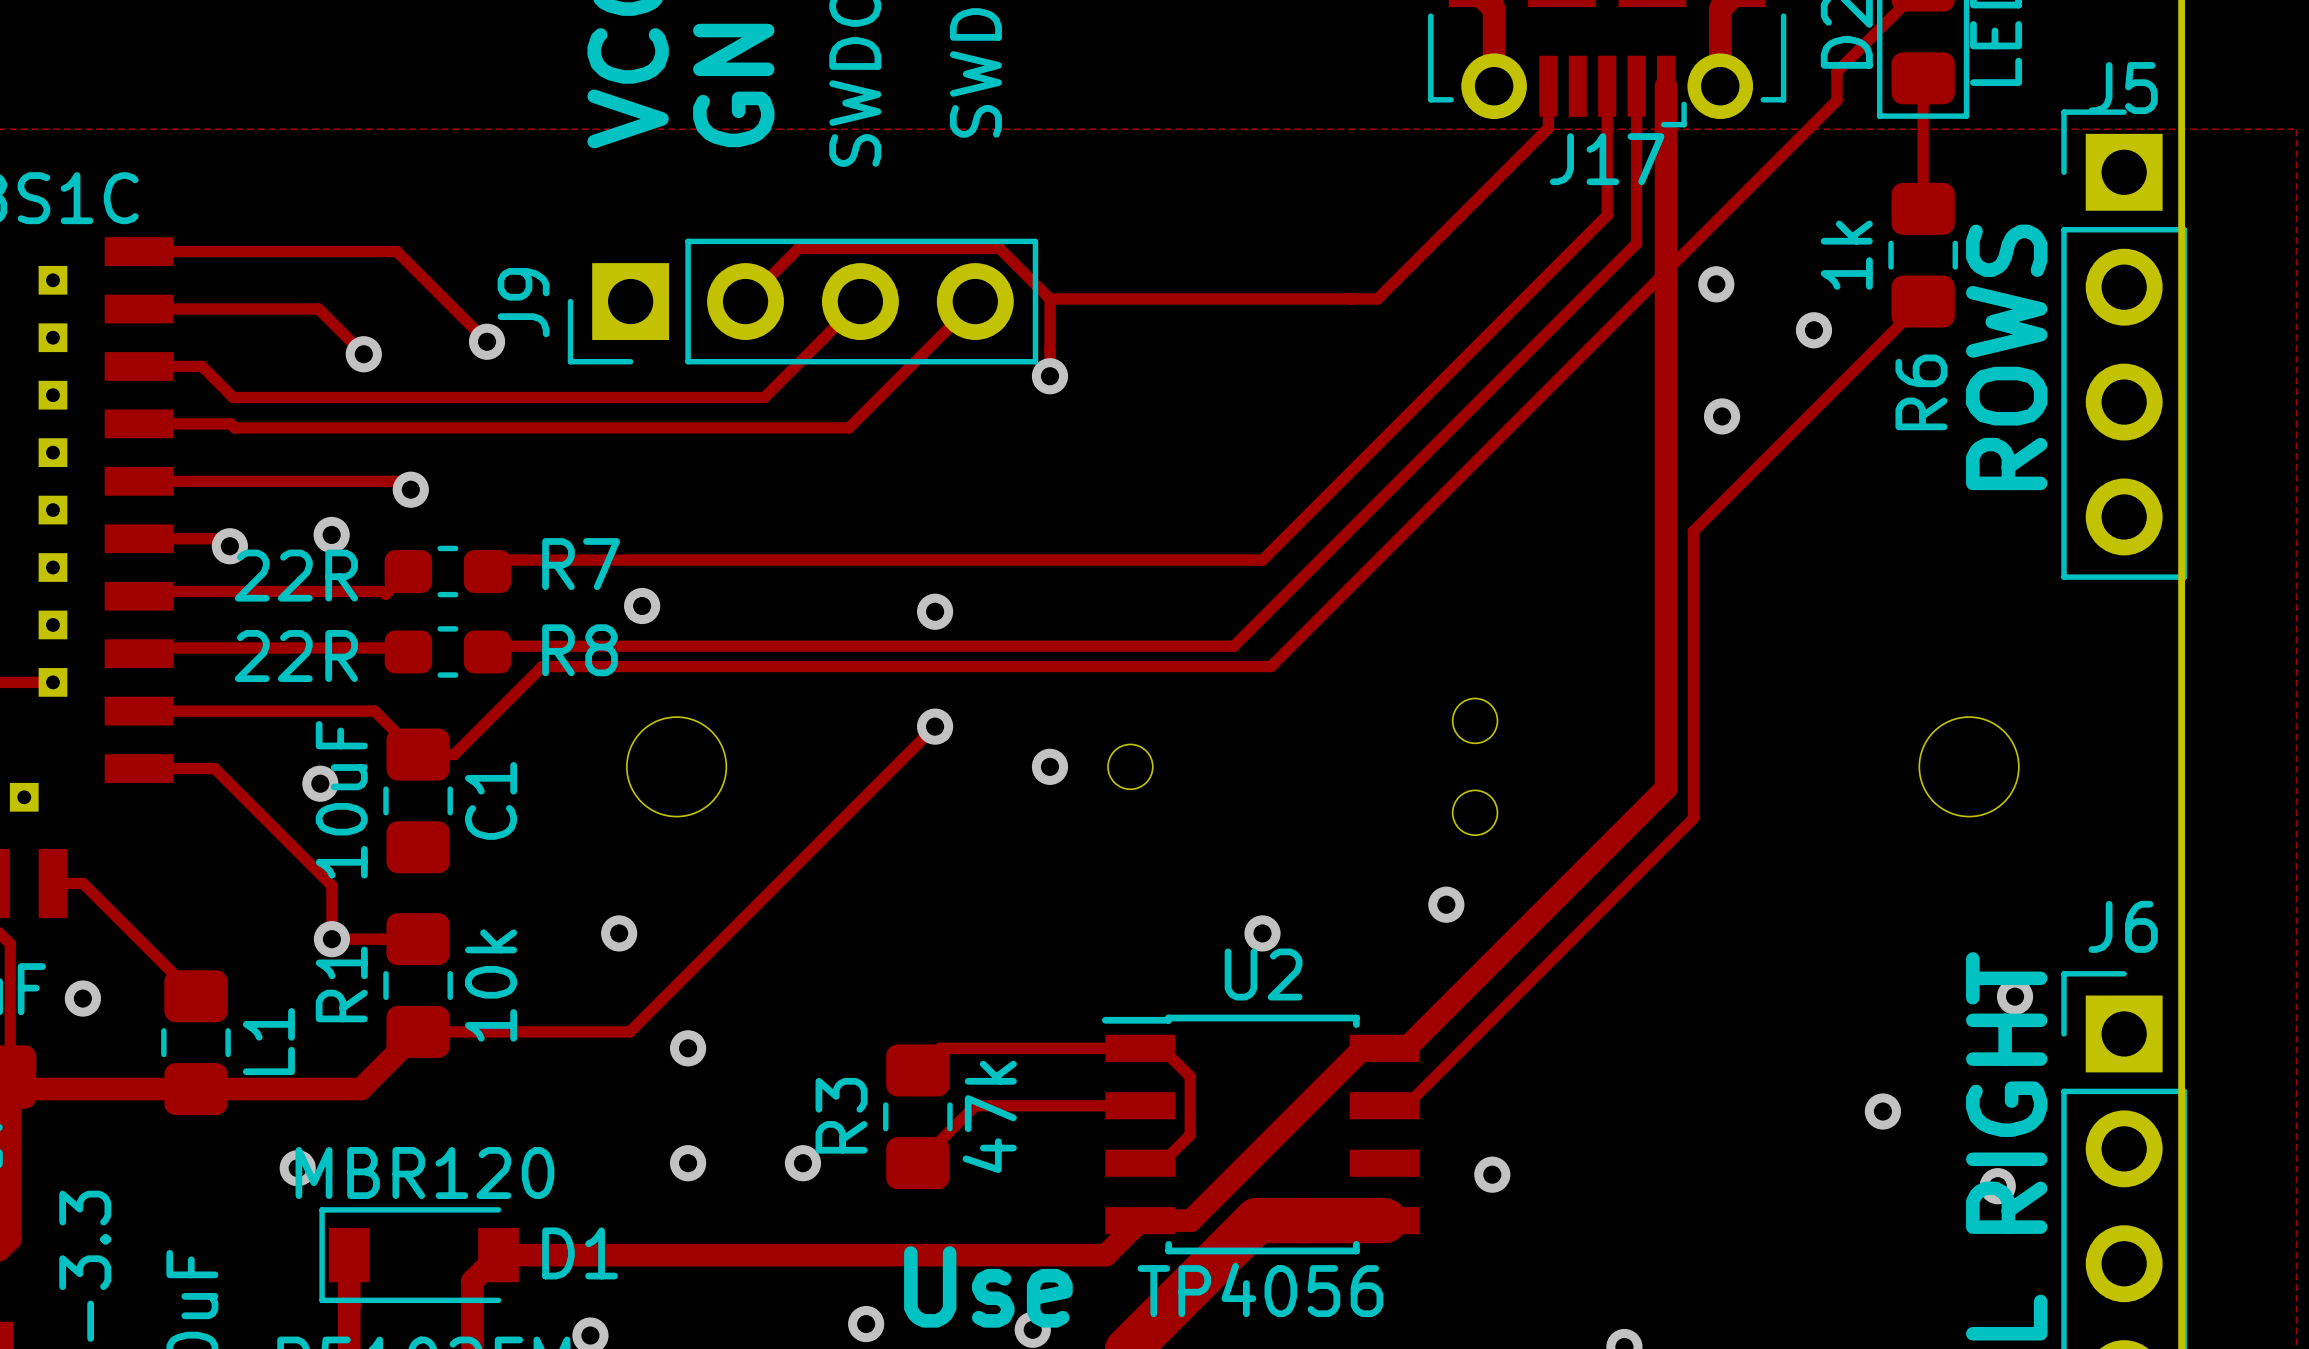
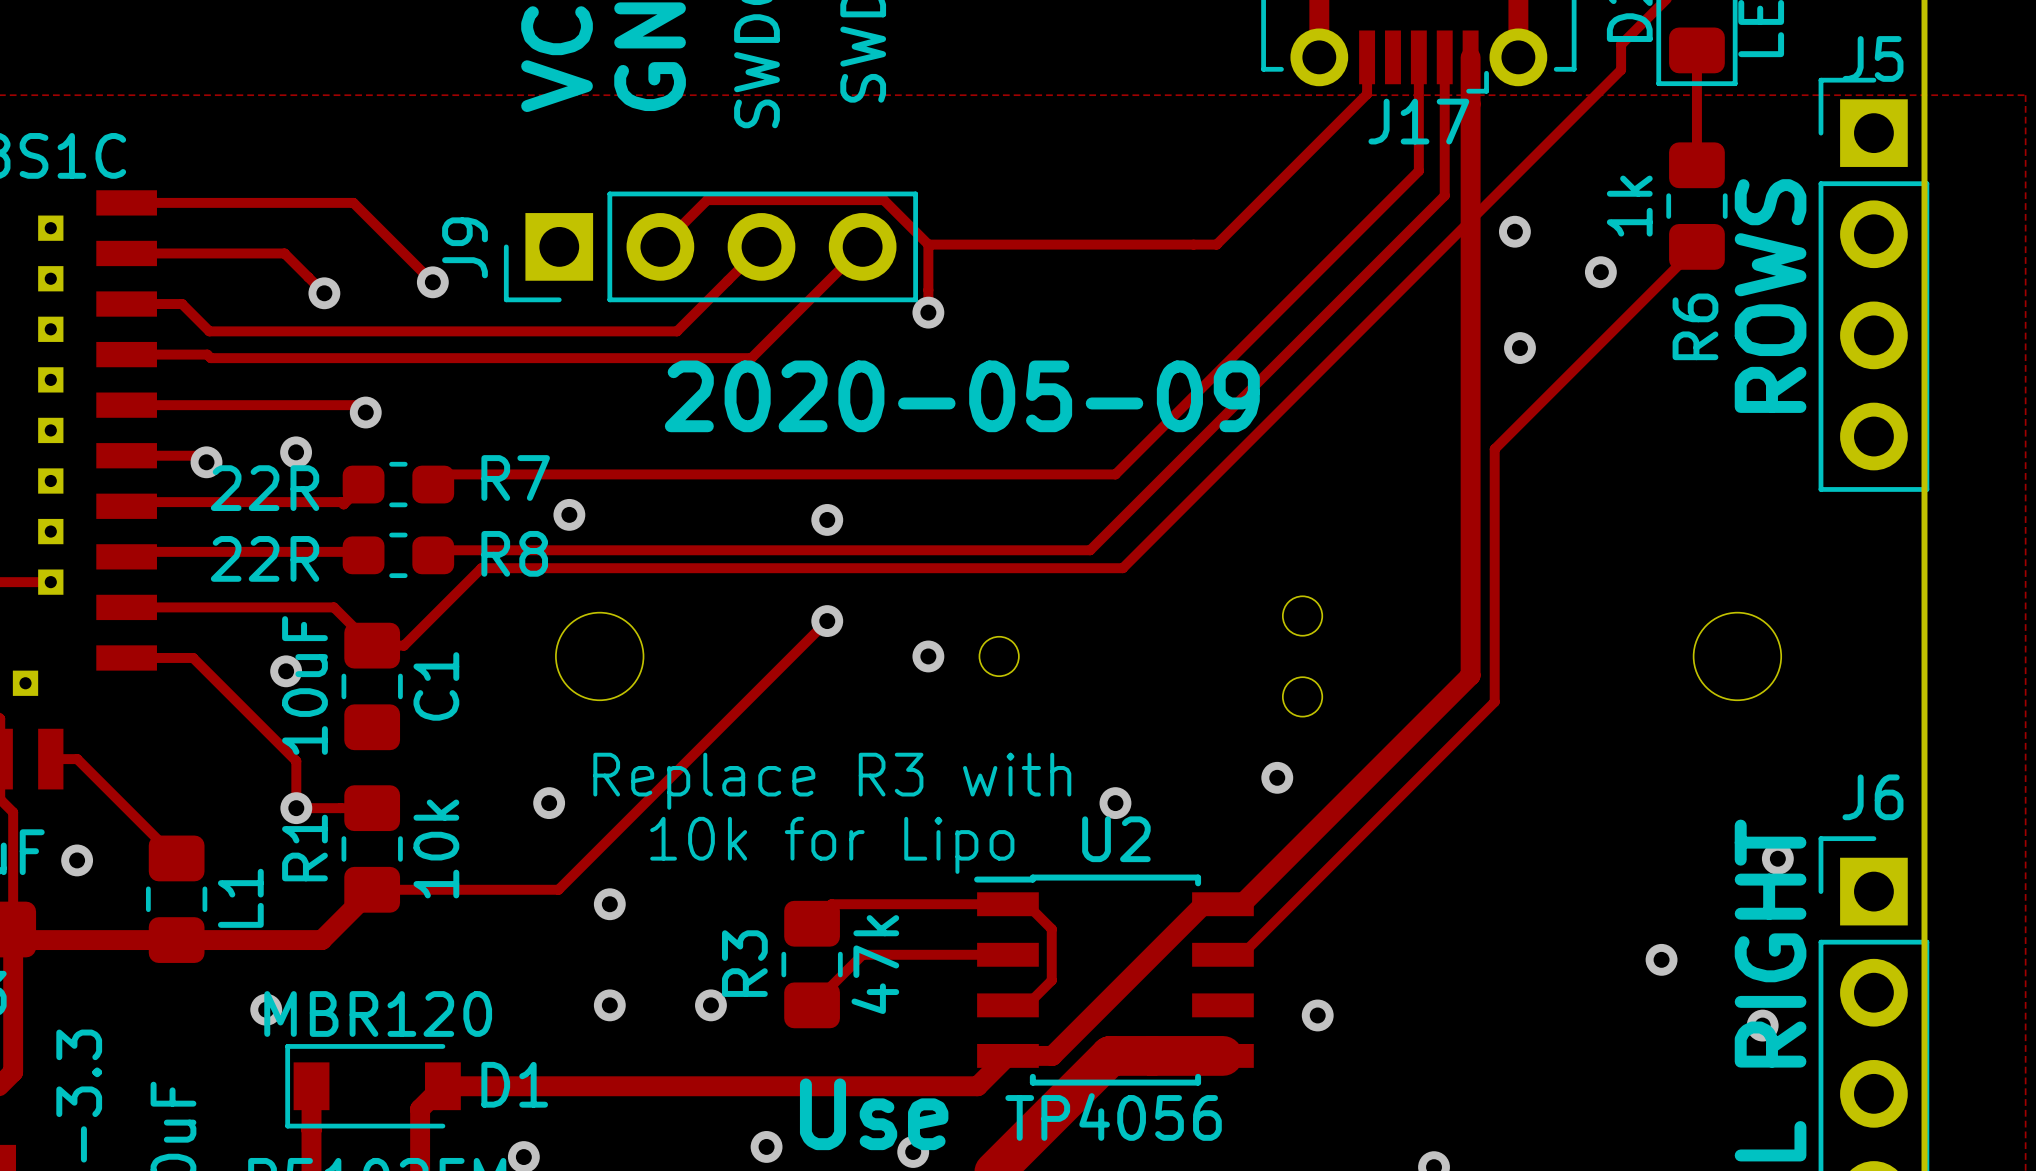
text: none -> 2020-05-09 (962, 396)
text: none -> Replace R3 with (832, 781)
text: none -> 10k for Lipo (832, 845)

